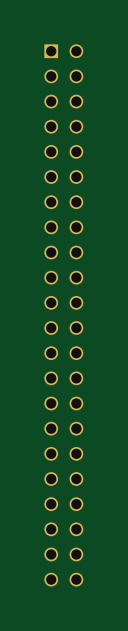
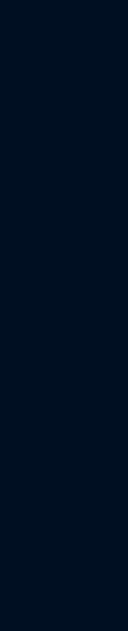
part: (63, 315) -> none

